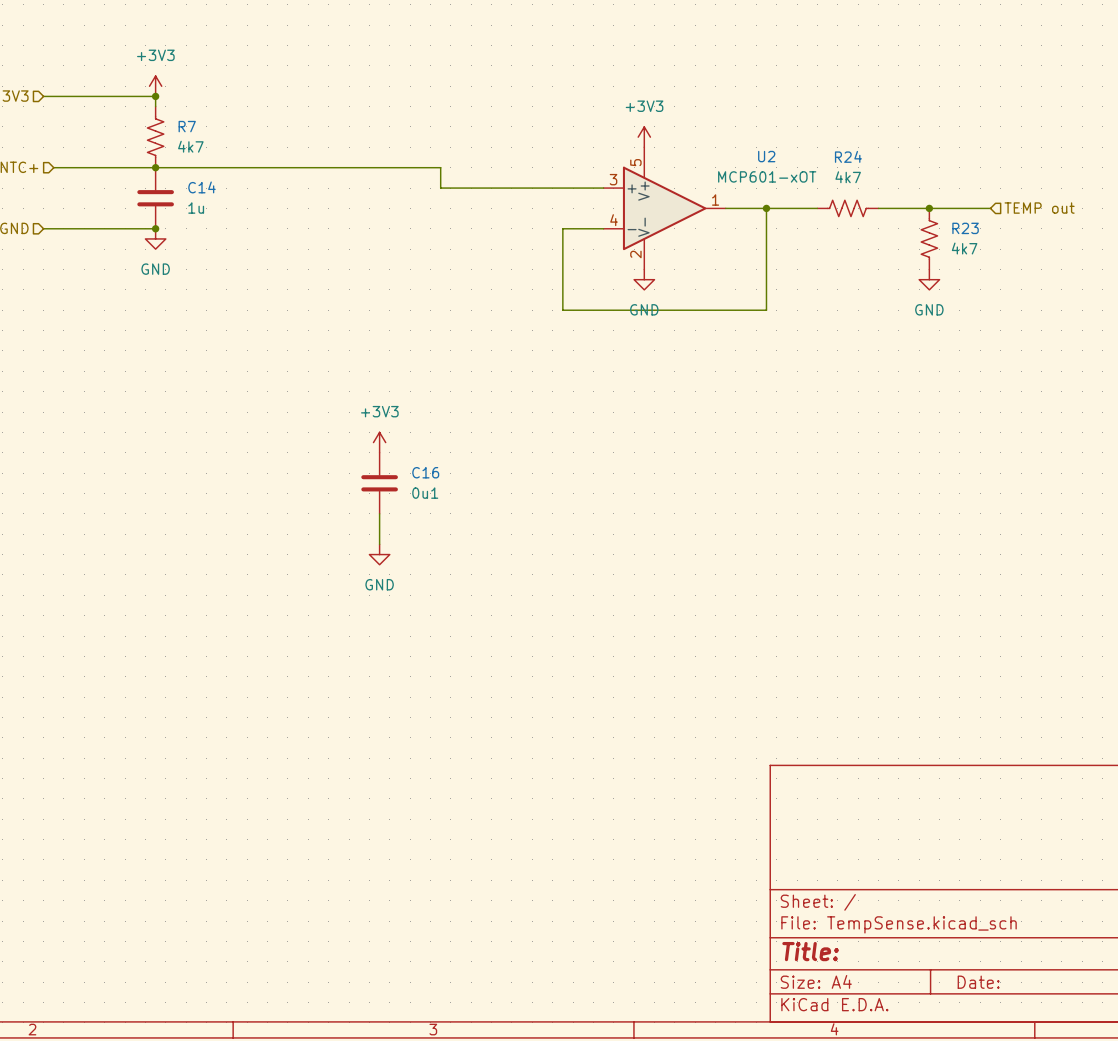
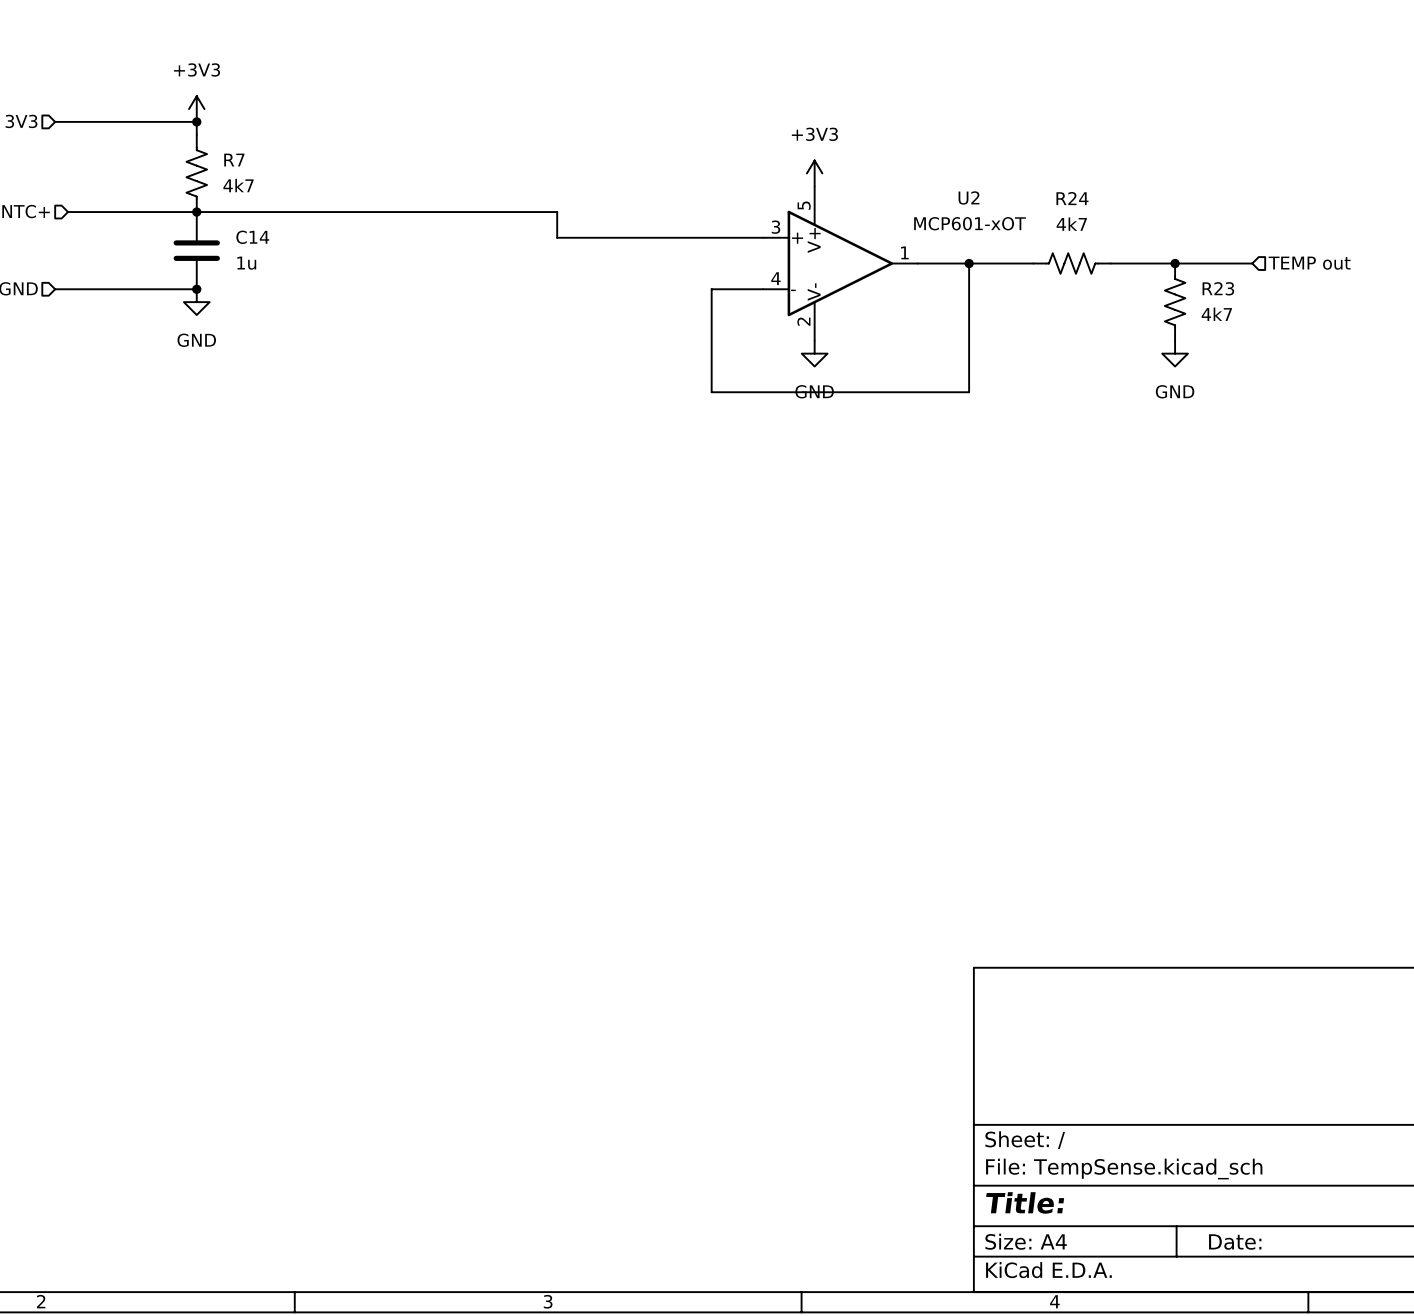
power symbol: +3V3 (379, 442) -> none
C16: 0u1 (379, 483) -> none
wire: (379, 513) (379, 544) -> none
power symbol: GND (379, 554) -> none

